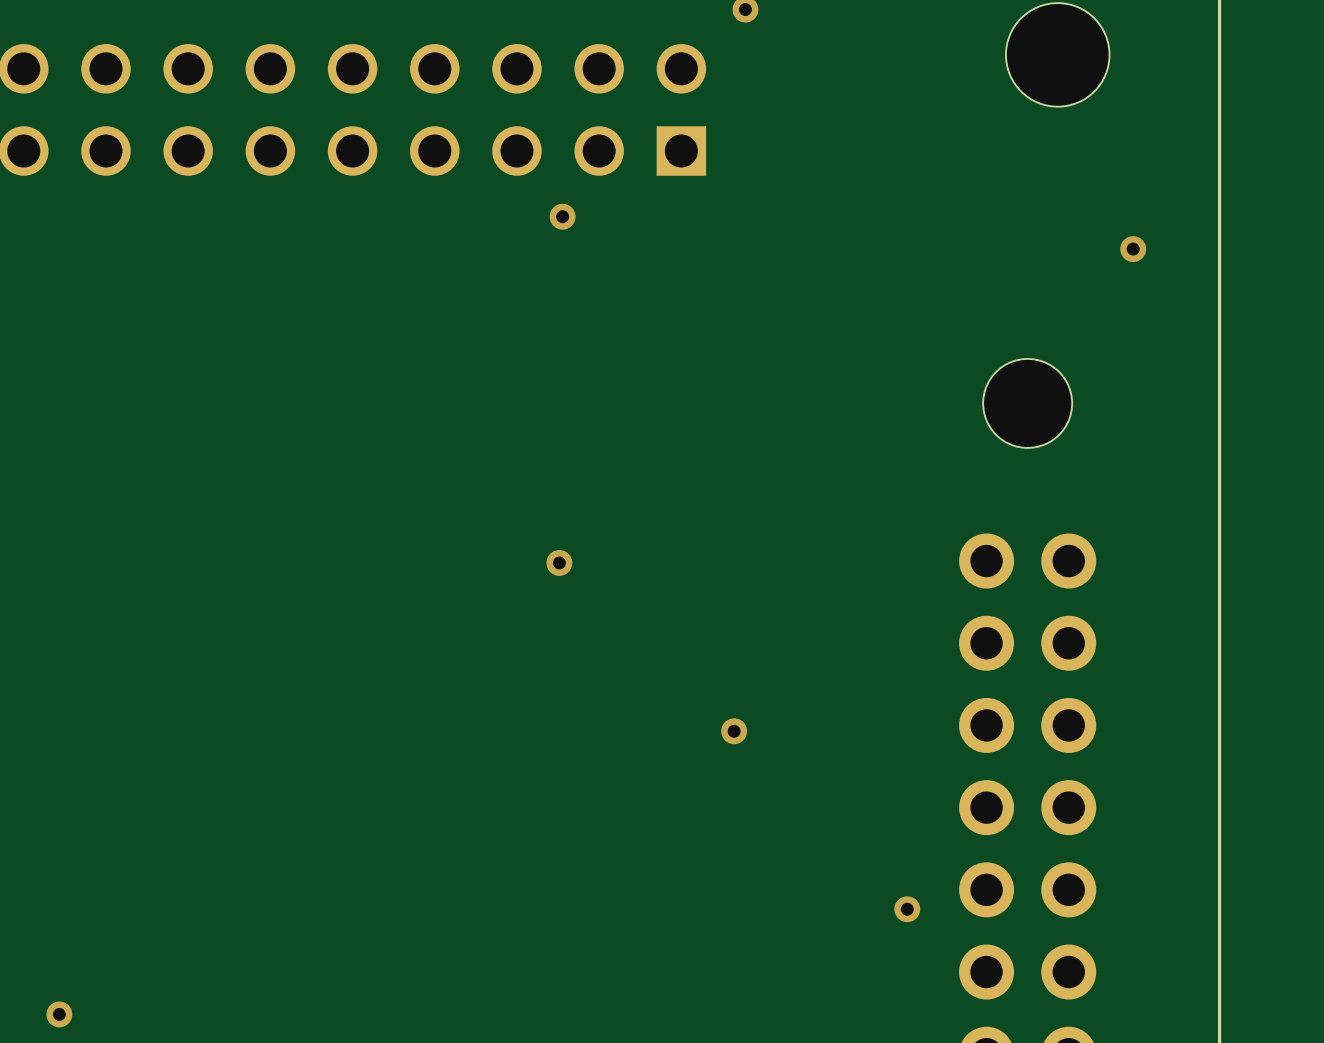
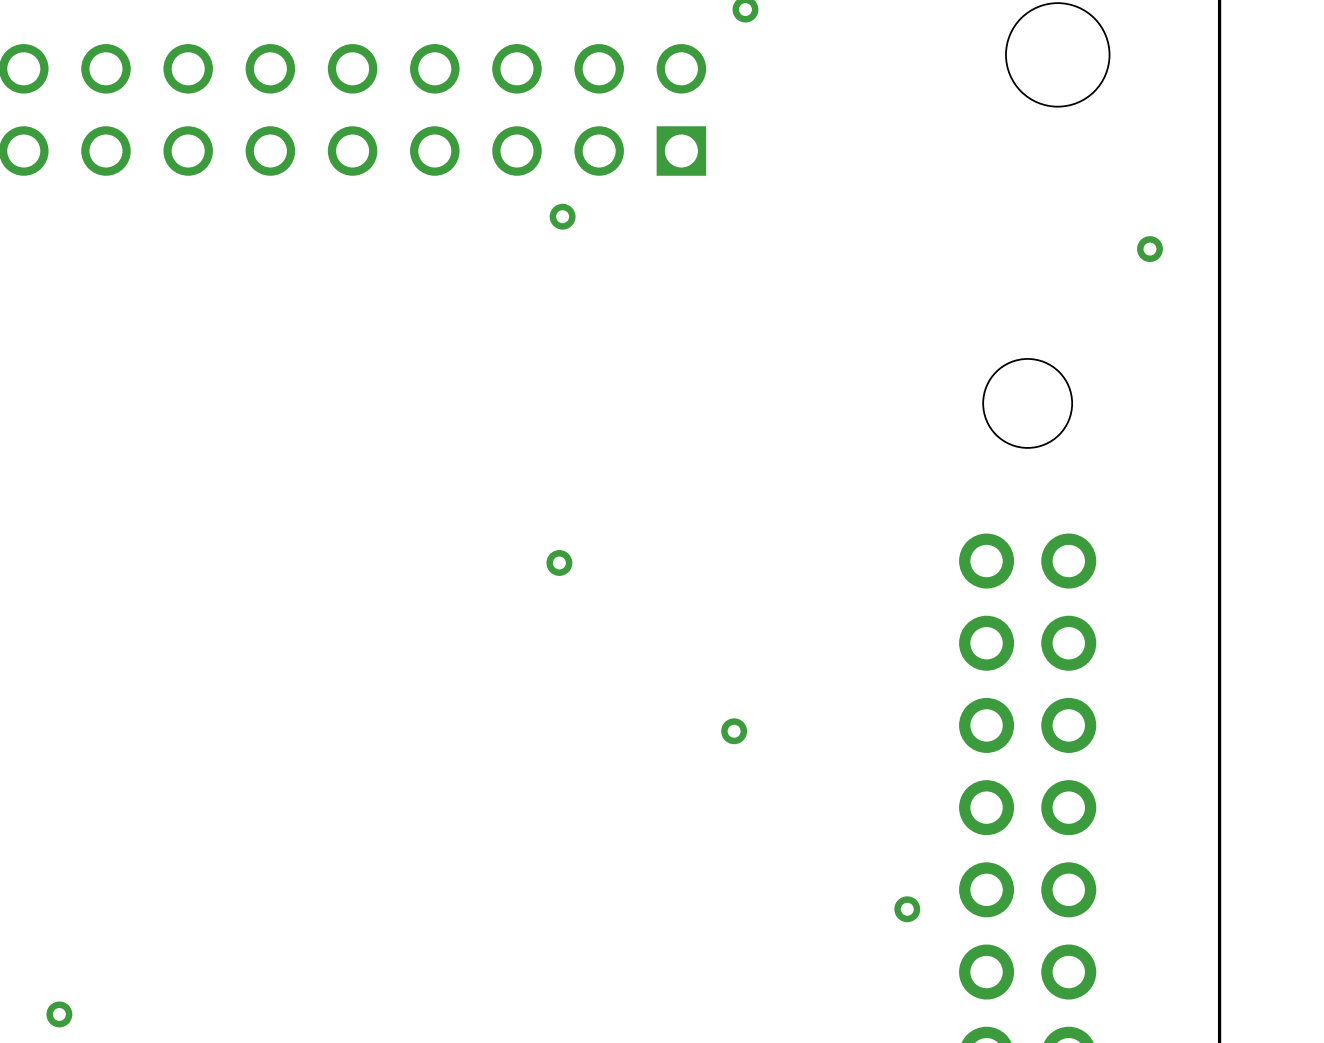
via position: (1133, 249) -> (1149, 249)

